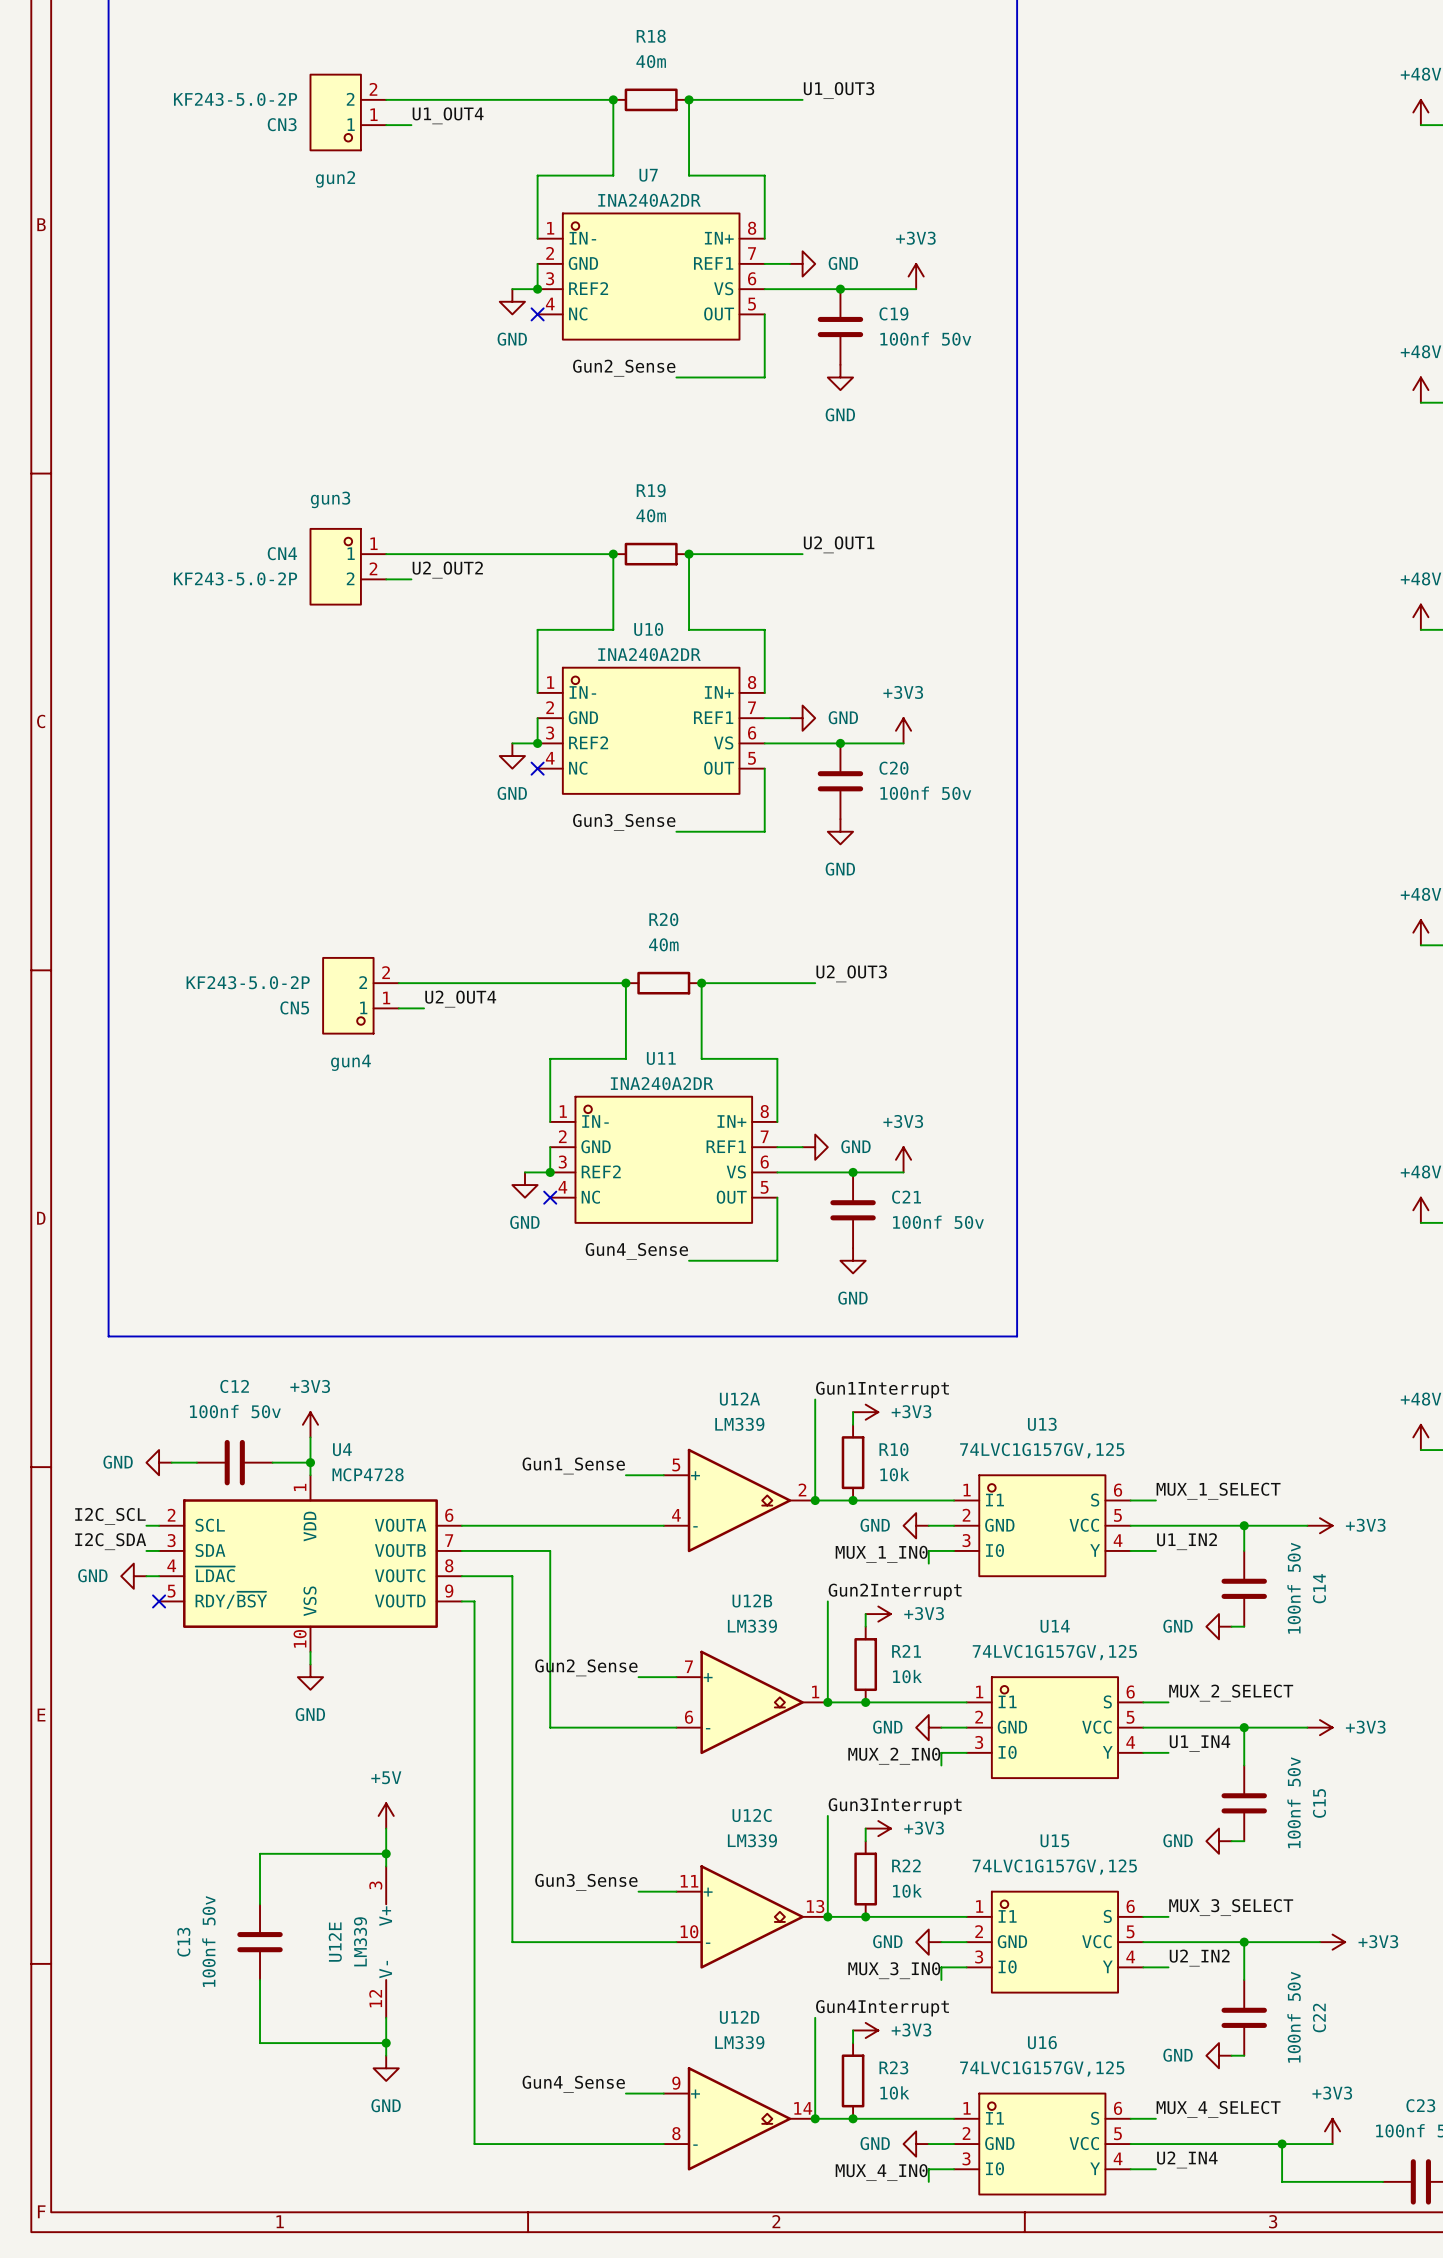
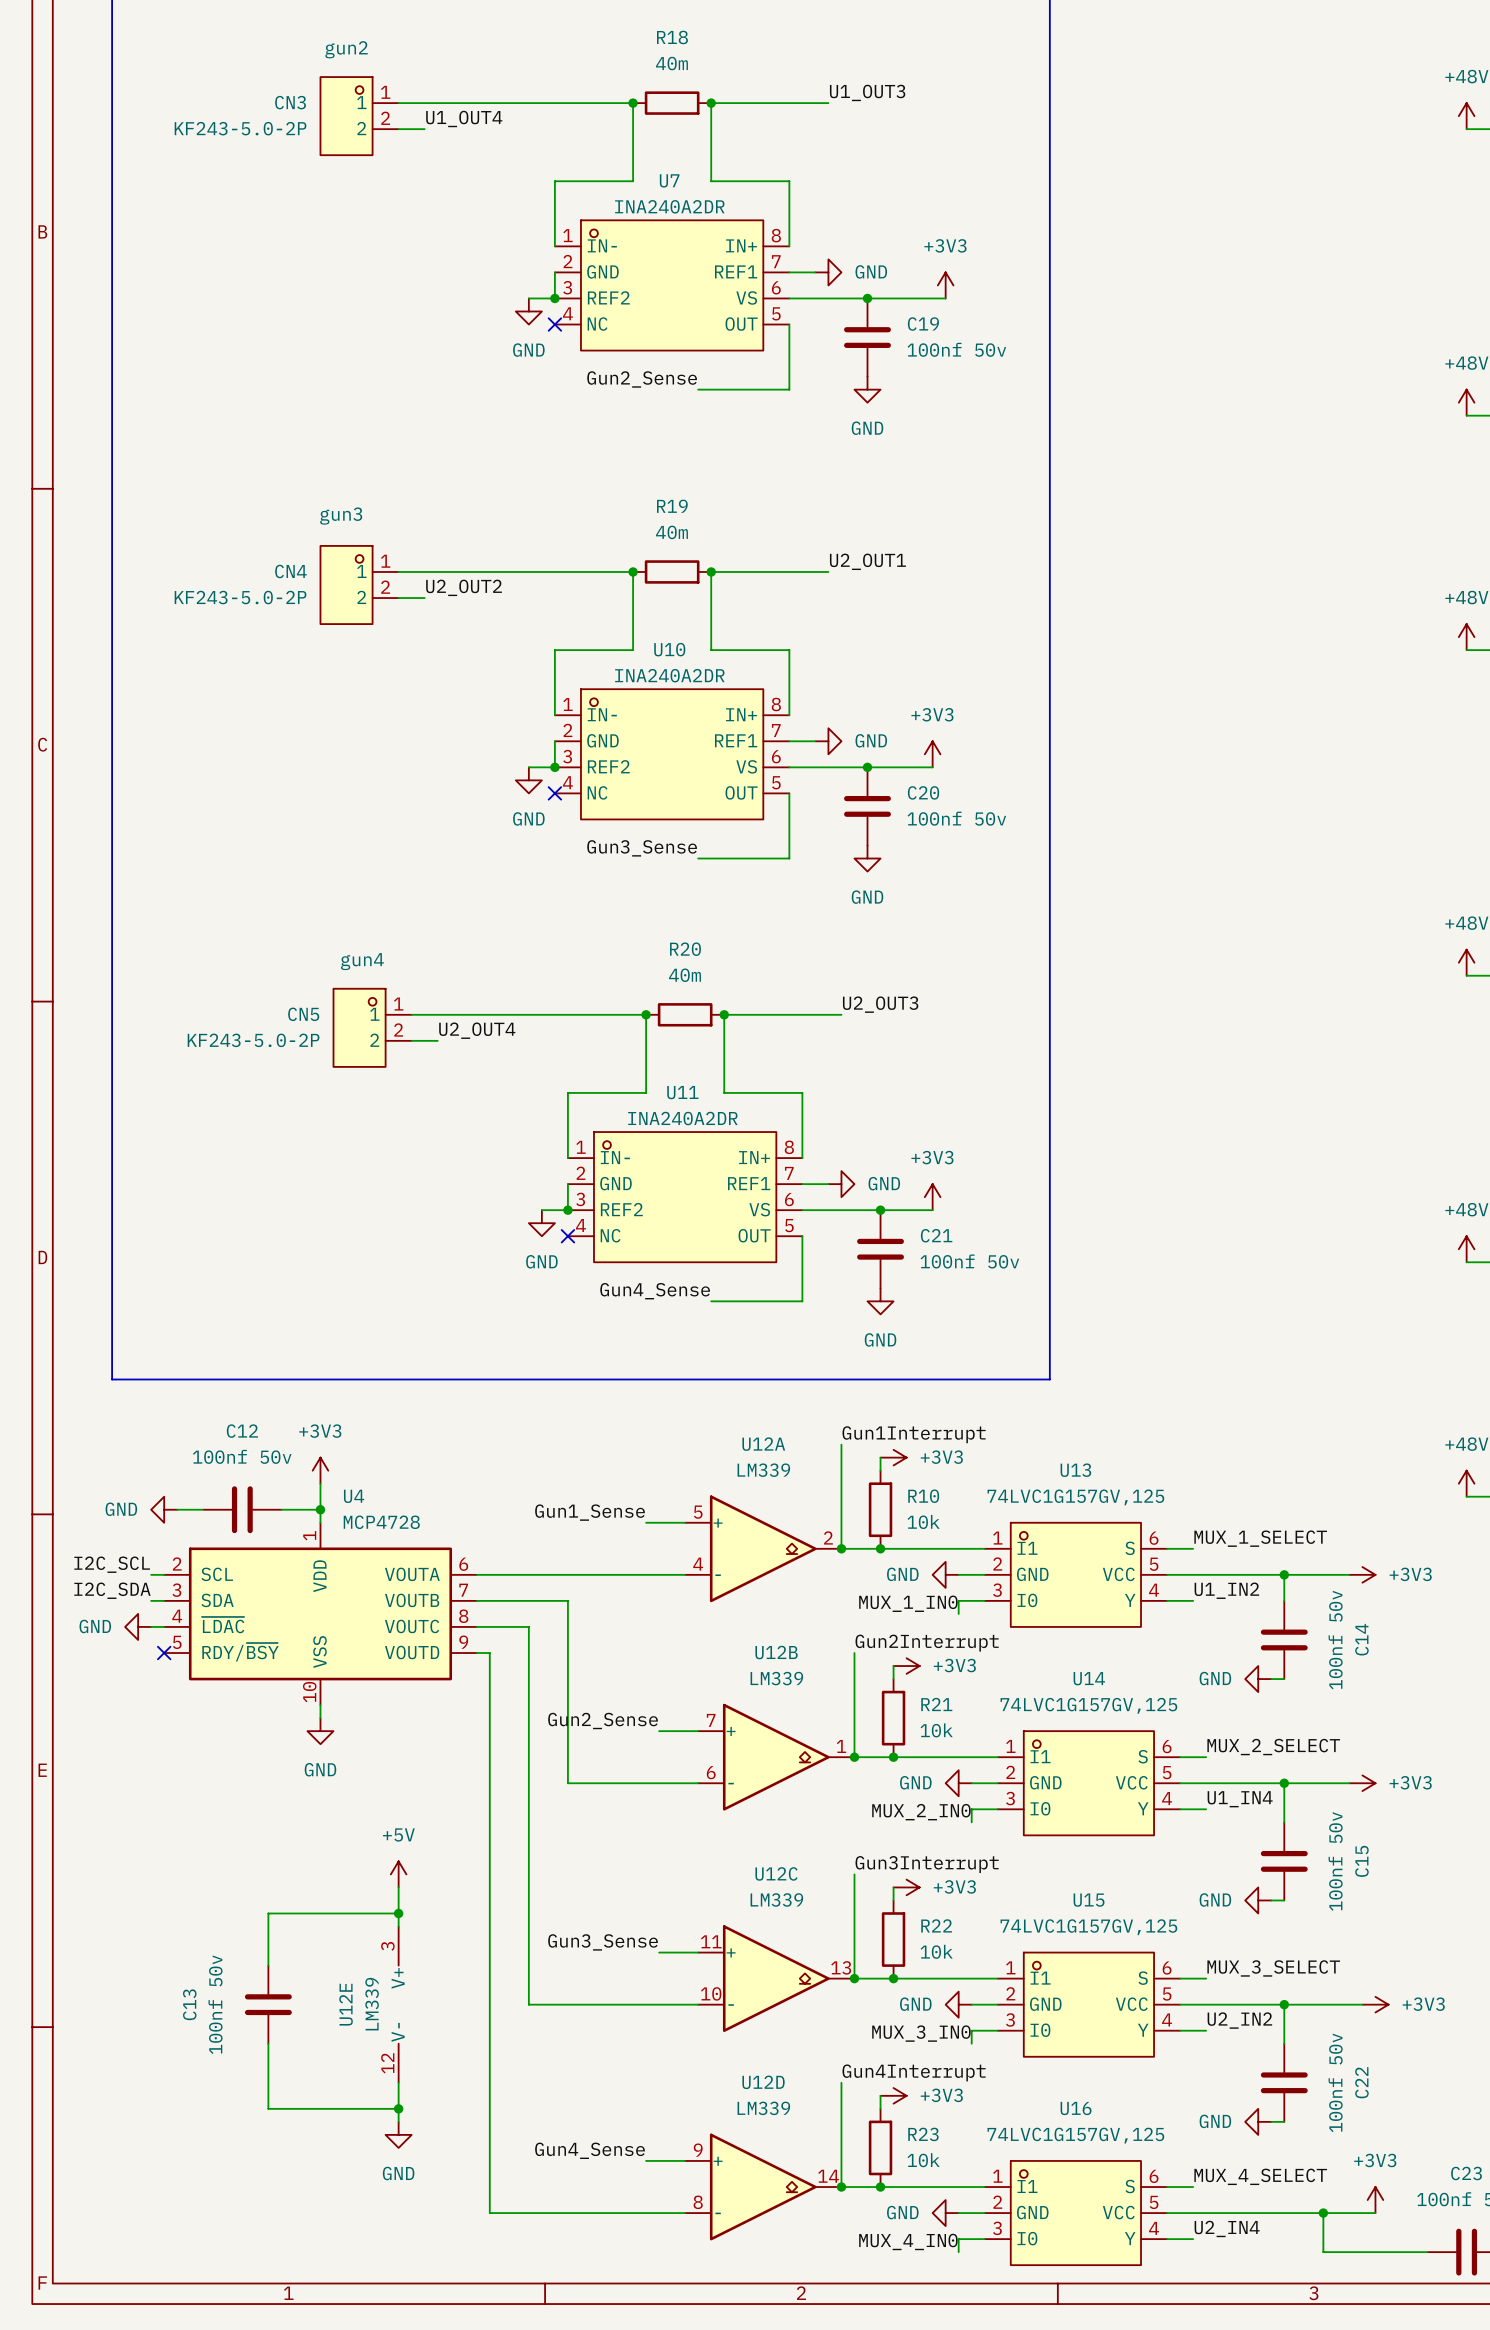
CN3 flip: as is (335, 112) -> up-down (346, 116)
CN5 flip: as is (348, 995) -> up-down (359, 1027)

